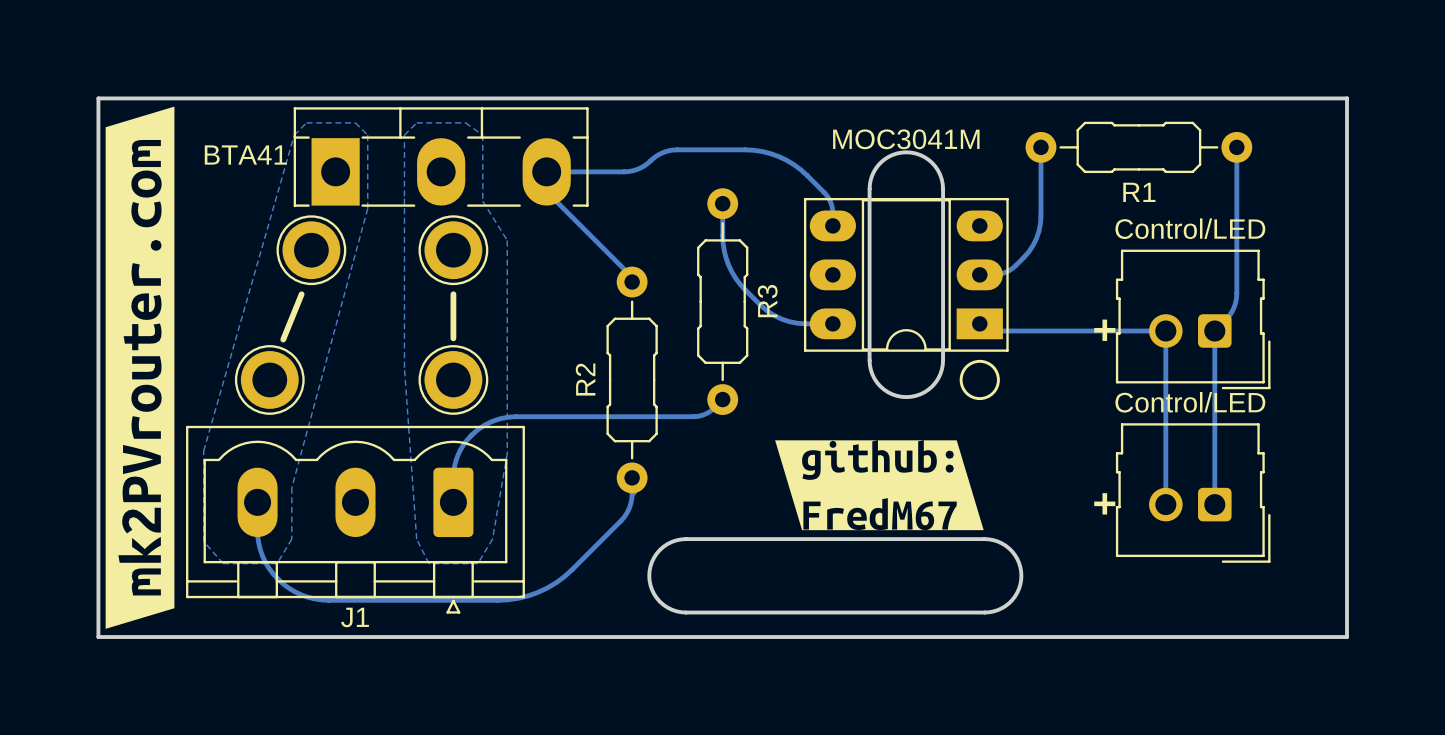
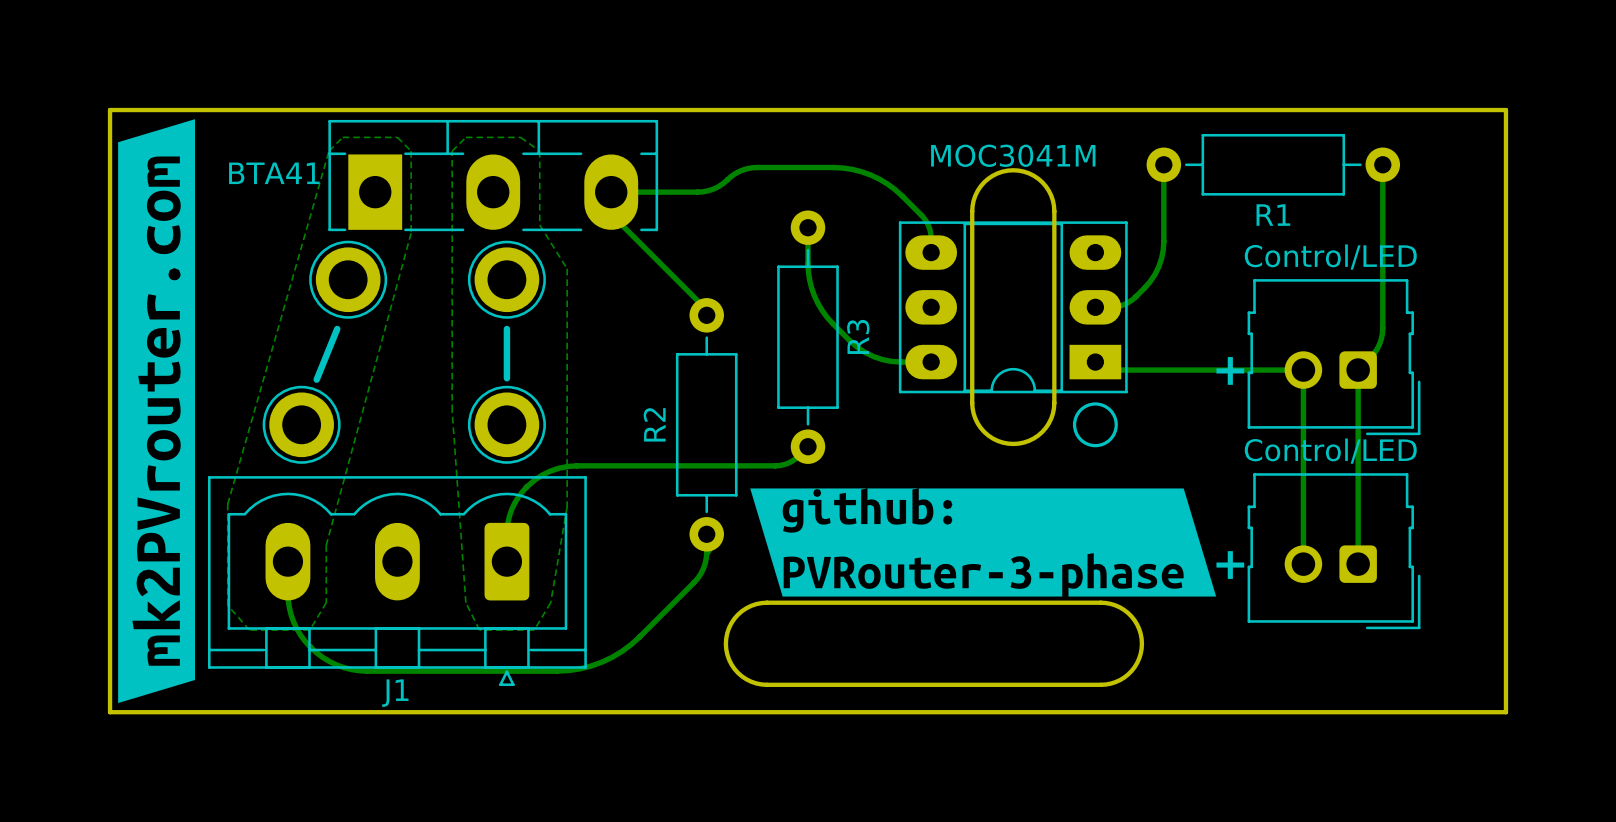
R1 footprint: [1025, 121, 1253, 174] -> [1146, 133, 1401, 196]
R3 footprint: [697, 188, 749, 415] -> [777, 210, 839, 464]
R2 footprint: [606, 266, 658, 494] -> [675, 298, 738, 552]
drawing shape: [775, 440, 984, 531] -> [750, 488, 1217, 597]

